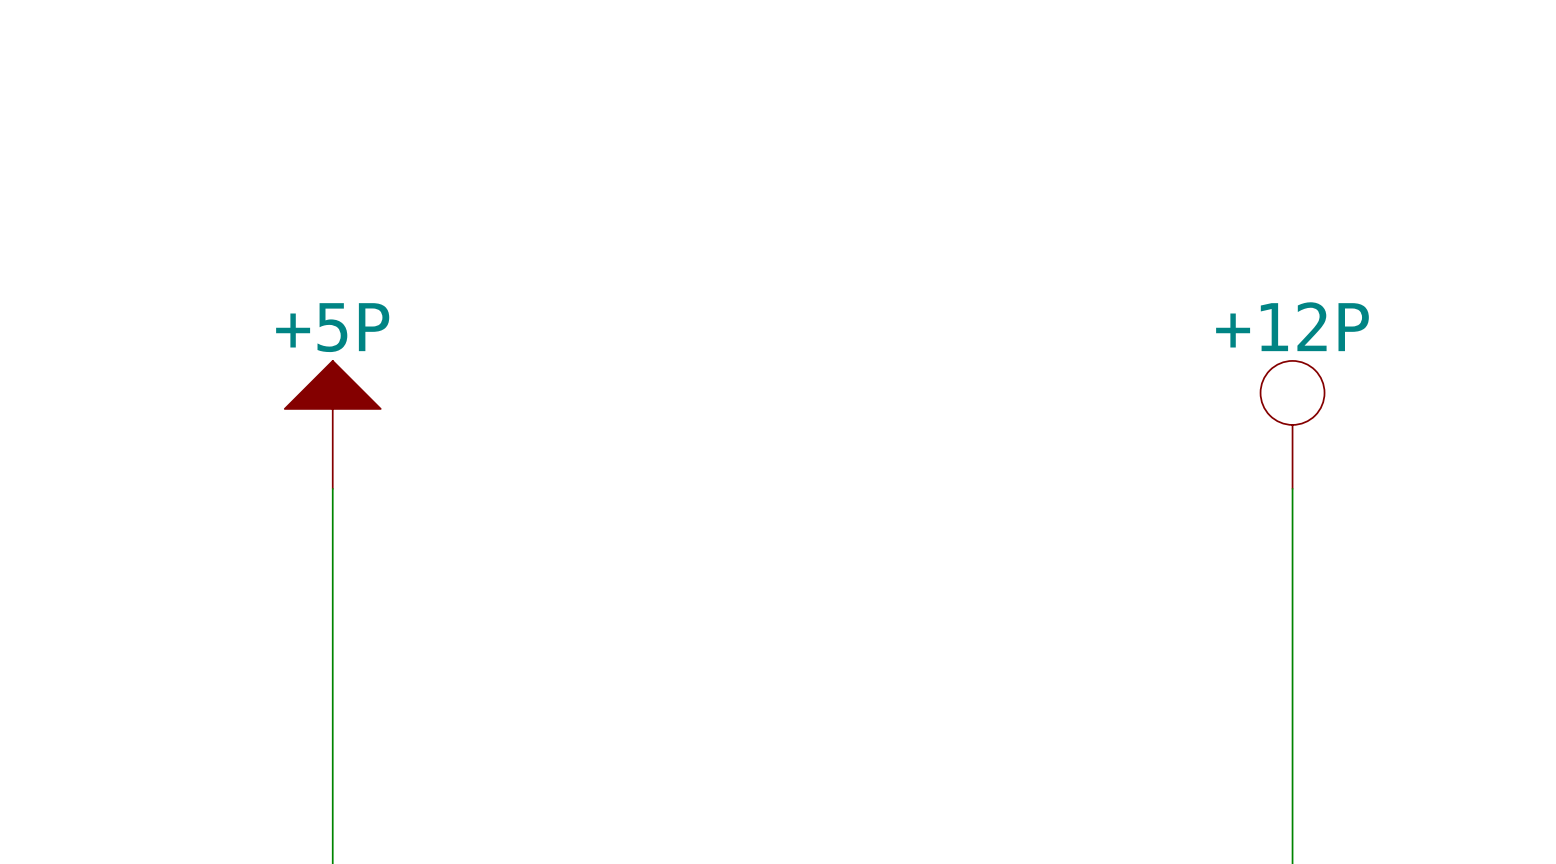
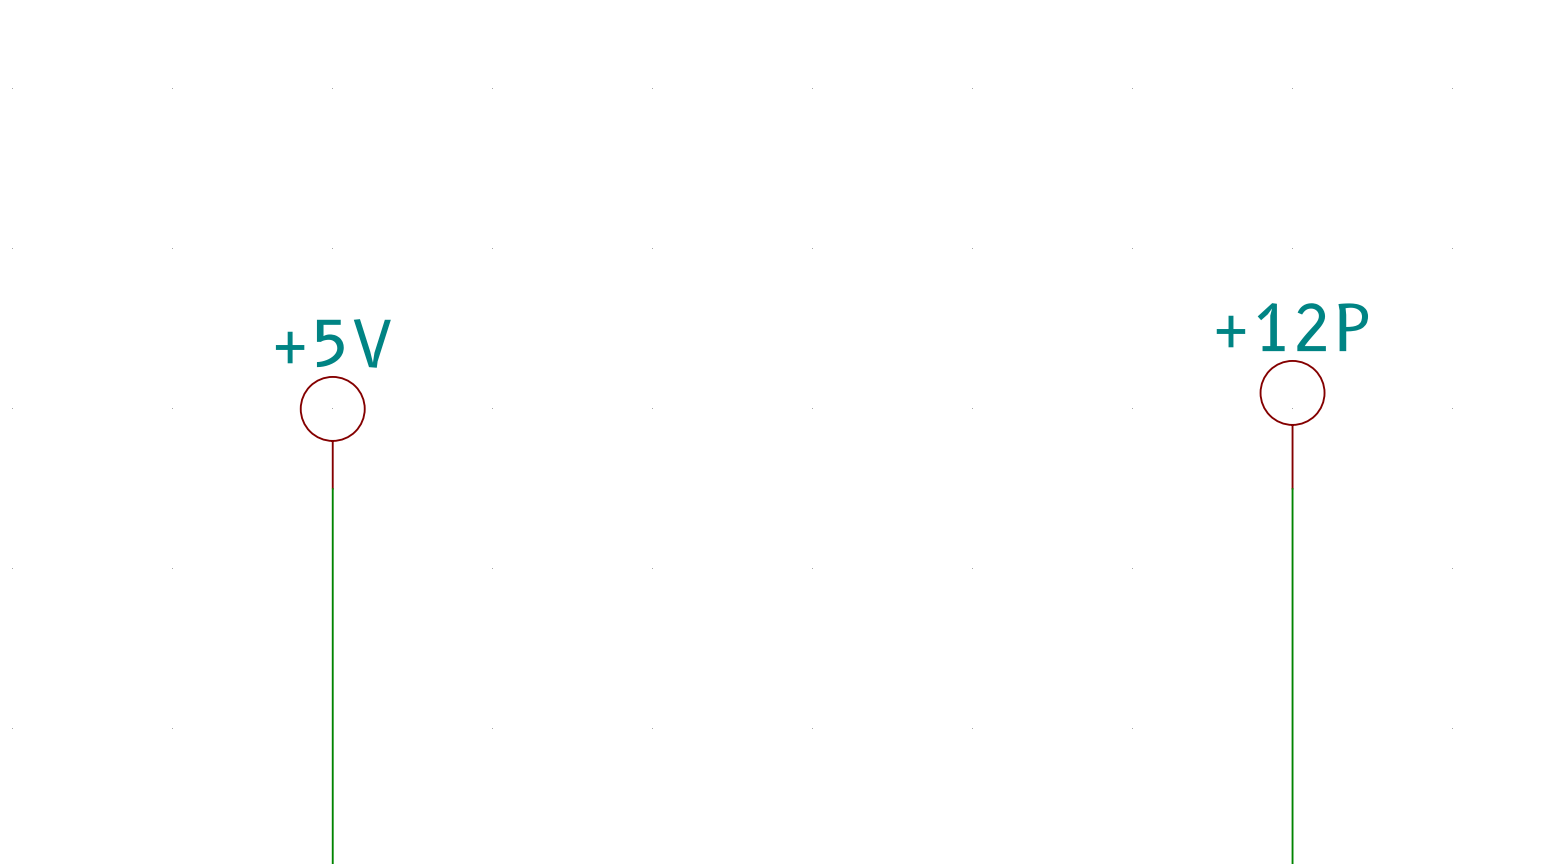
power symbol: +5P (332, 424) -> +5V (332, 432)

